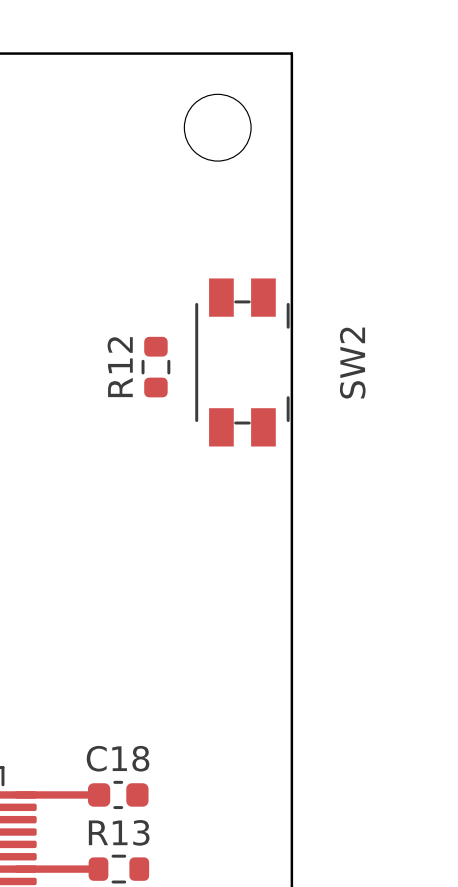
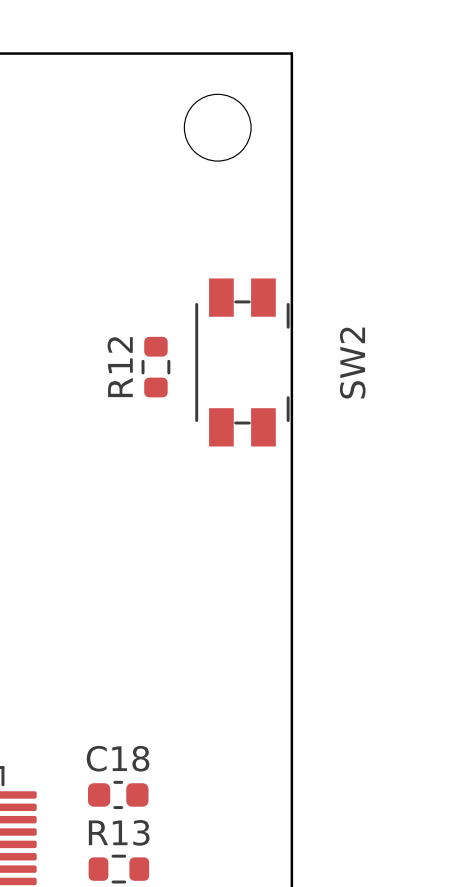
track: (16, 794) (99, 794) -> none
track: (16, 869) (98, 869) -> none

